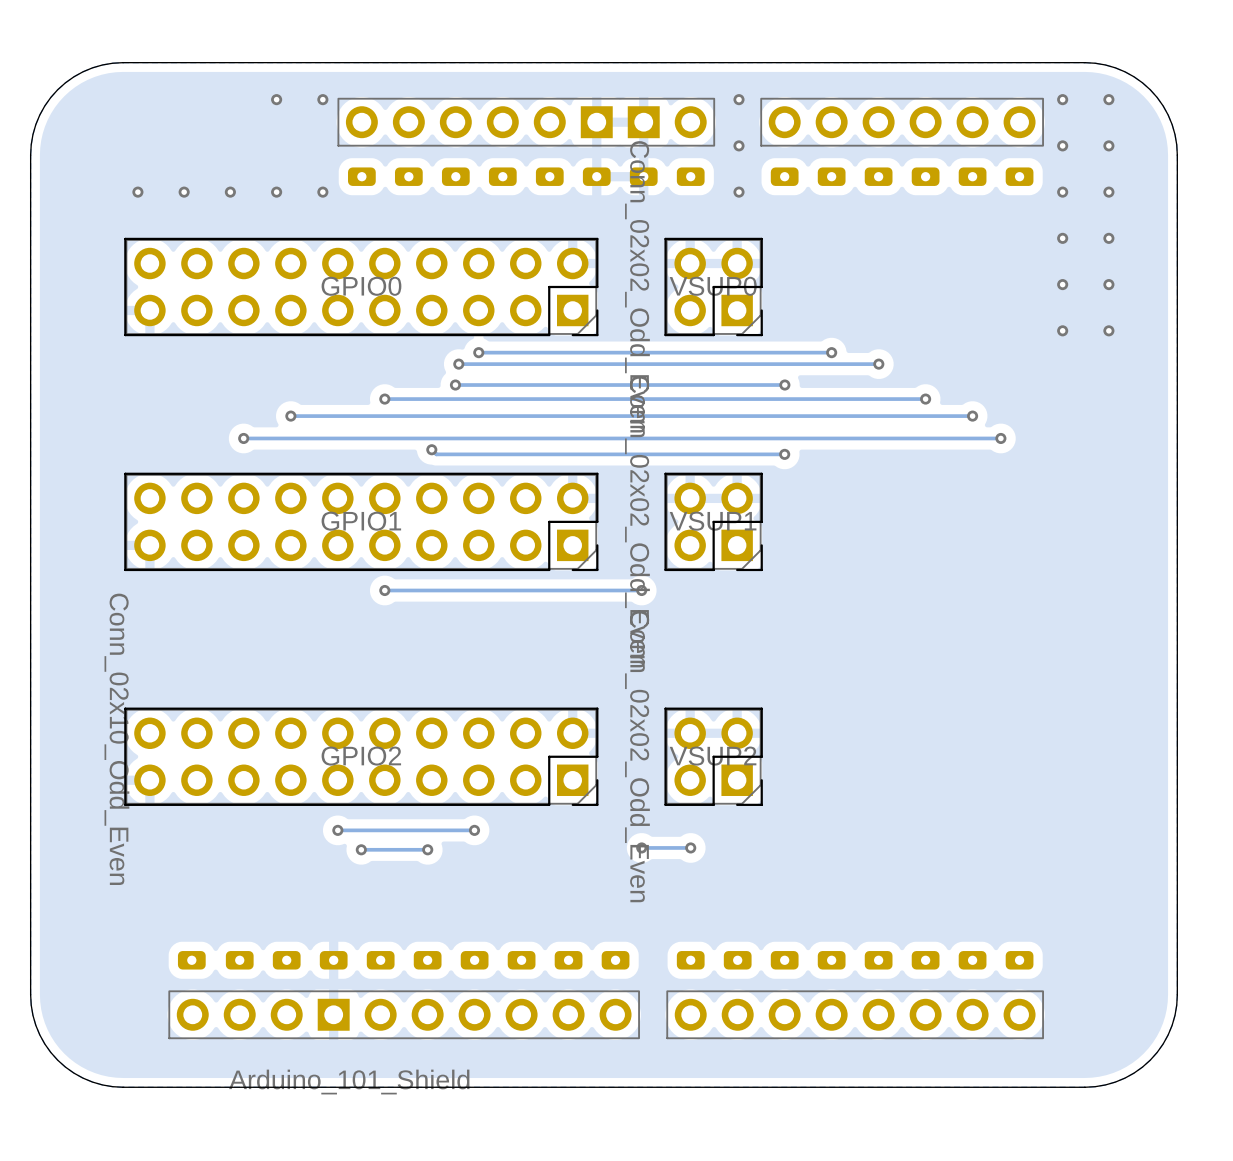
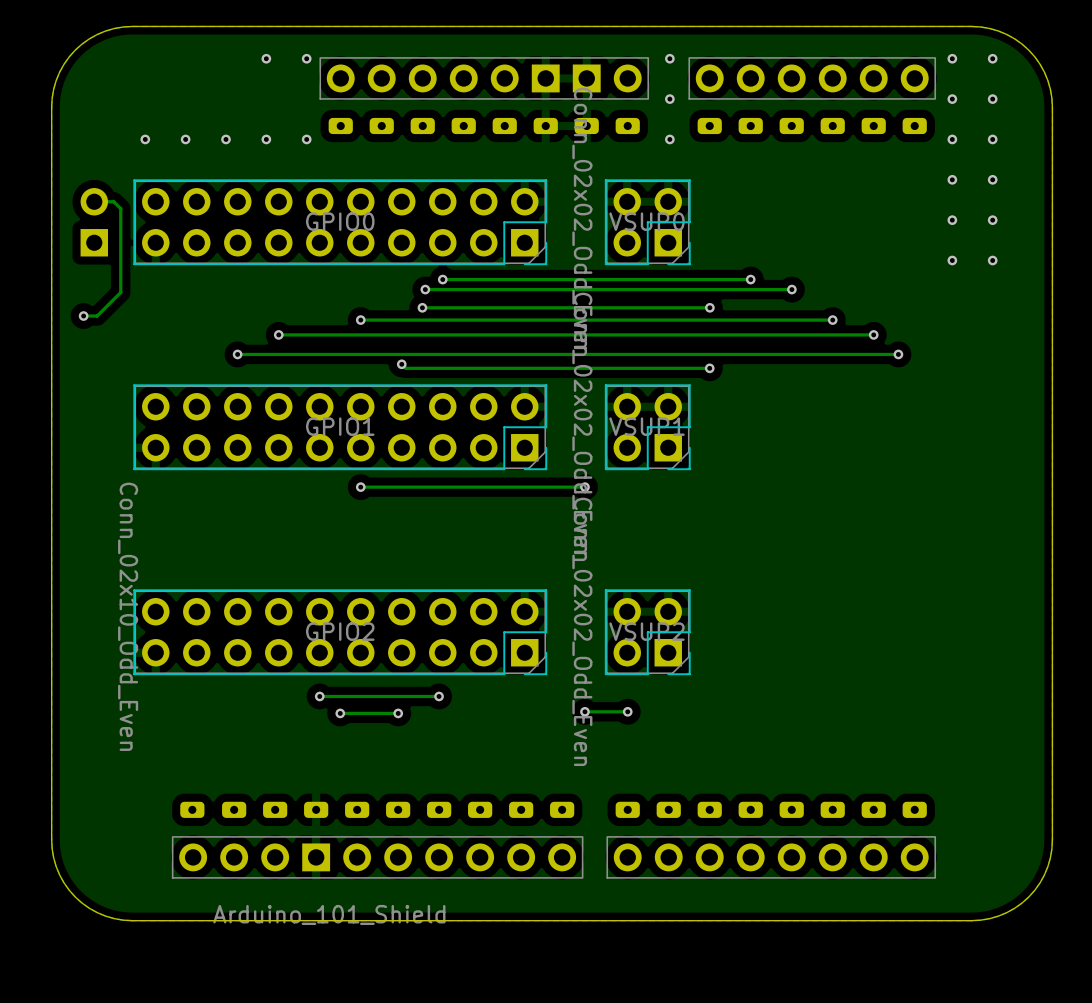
track: none -> (94, 201) (113, 201) (120, 208) (120, 292) (97, 316) (83, 316)
part: none -> (94, 222)
via: none -> (83, 316)

